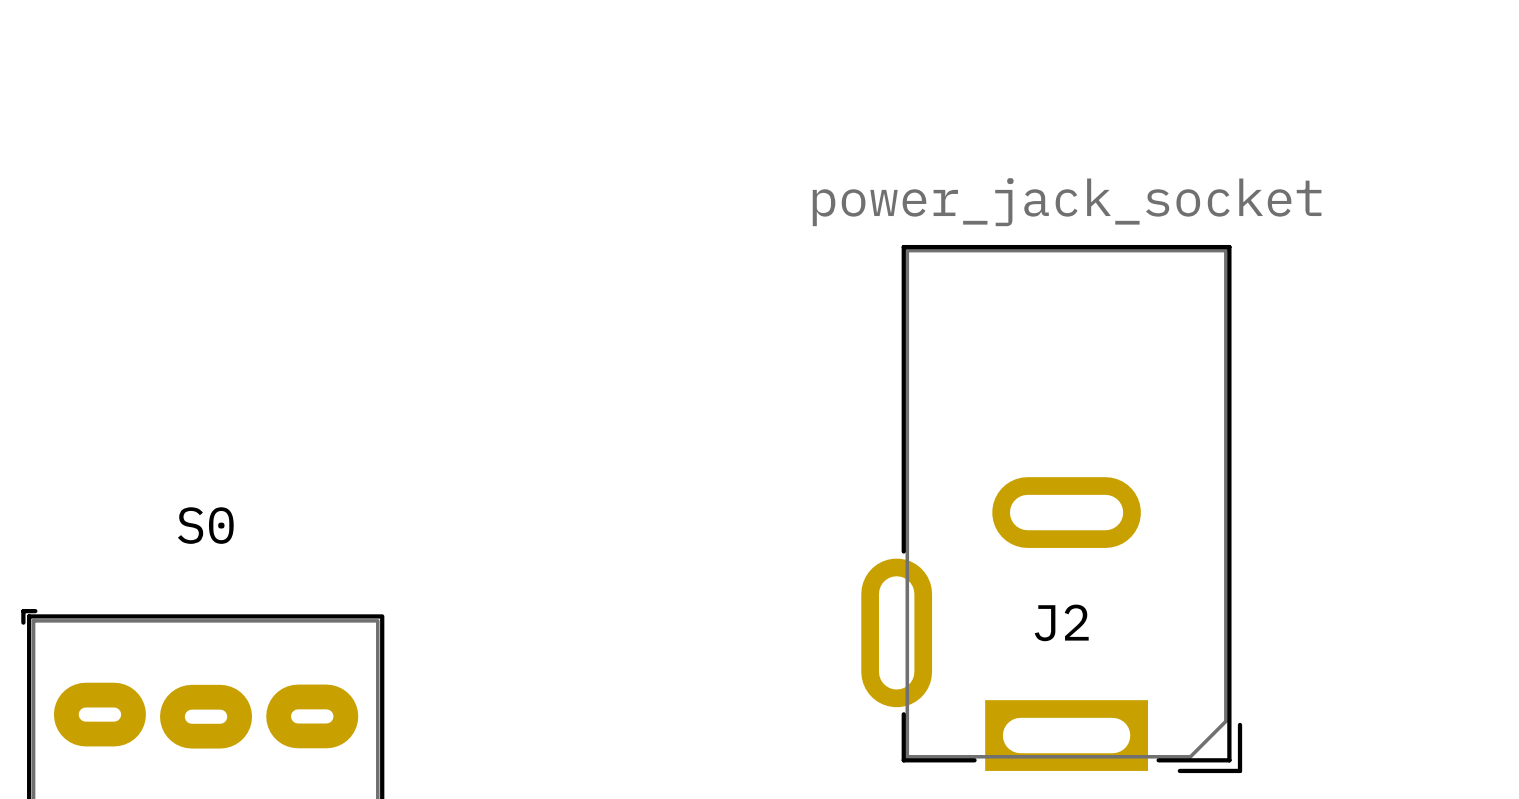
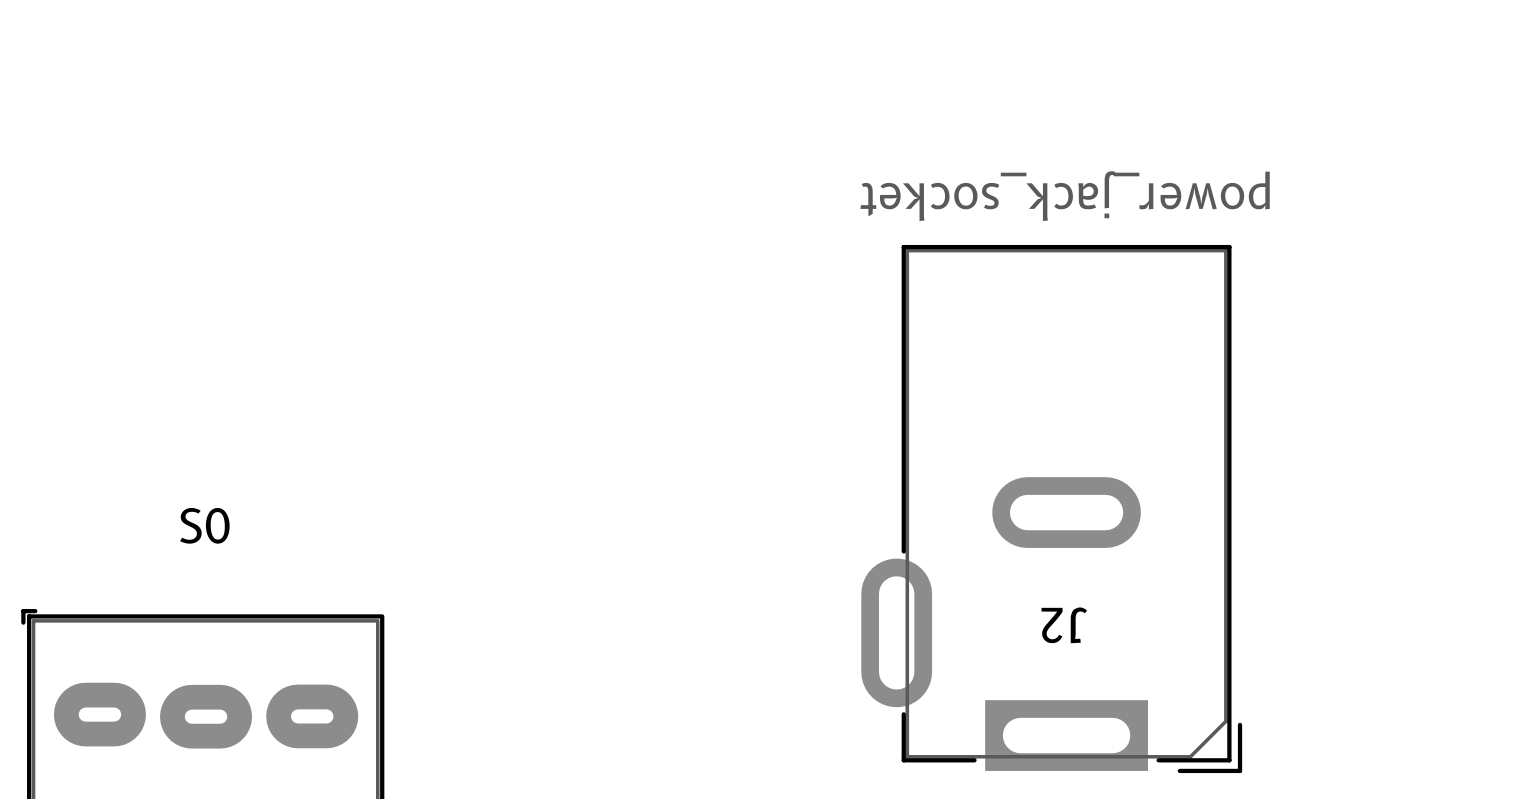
J2 value rotation: 0° (1067, 202) -> 180° (1065, 196)
J2 name rotation: 0° (1061, 622) -> 180° (1064, 625)

